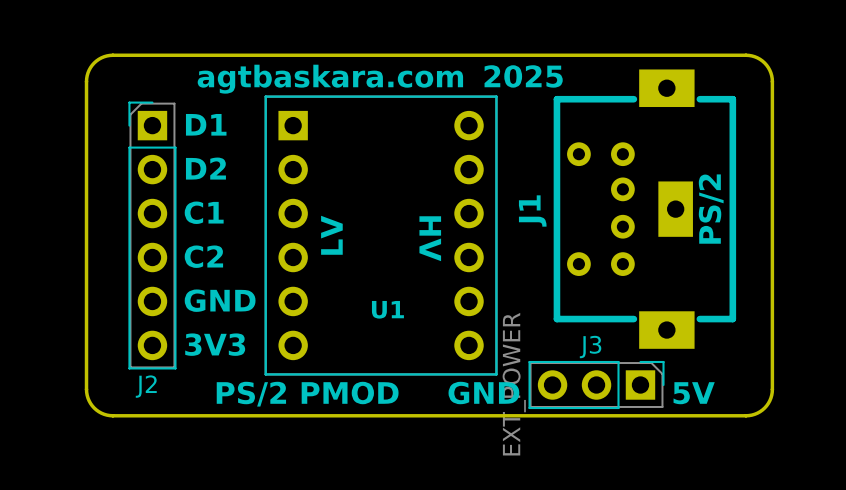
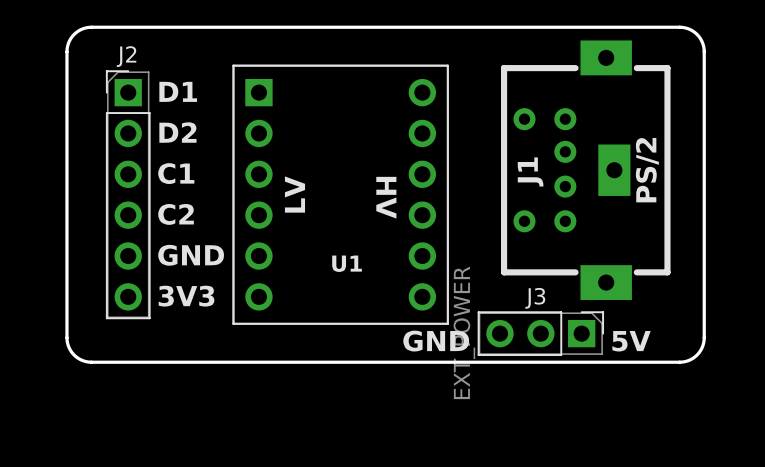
text: 2025 (523, 76) -> none
text: agtbaskara.com (330, 79) -> none
J1 name position: J1 (532, 210) -> J1 (530, 171)
J2 name position: J2 (146, 386) -> J2 (126, 56)
text: PS/2 PMOD (307, 394) -> none

